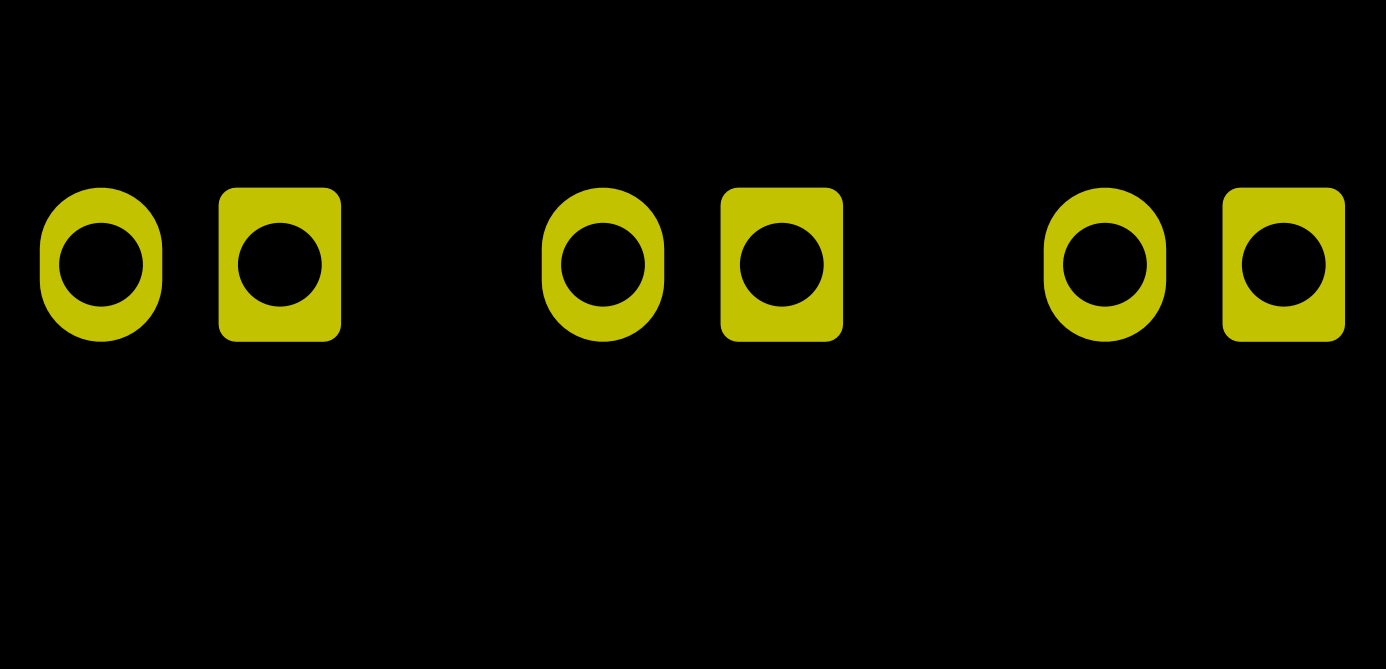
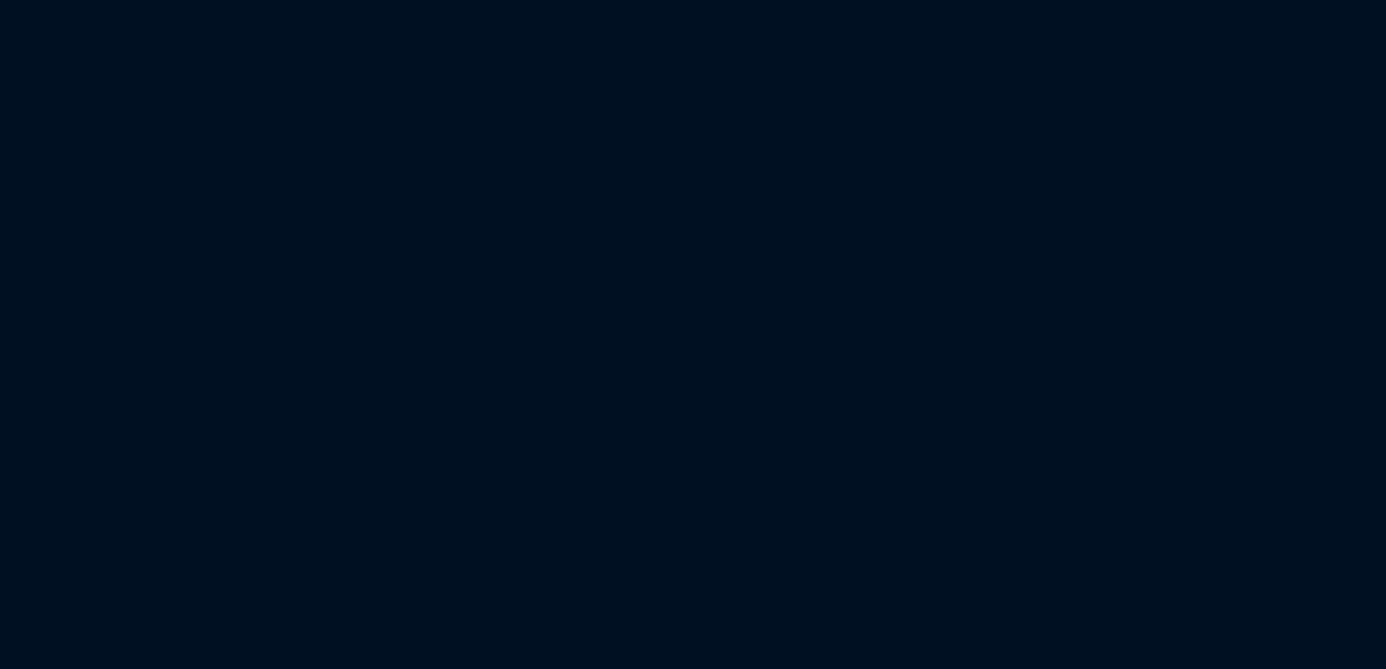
part: (190, 264) -> none
part: (692, 264) -> none
part: (1194, 264) -> none

